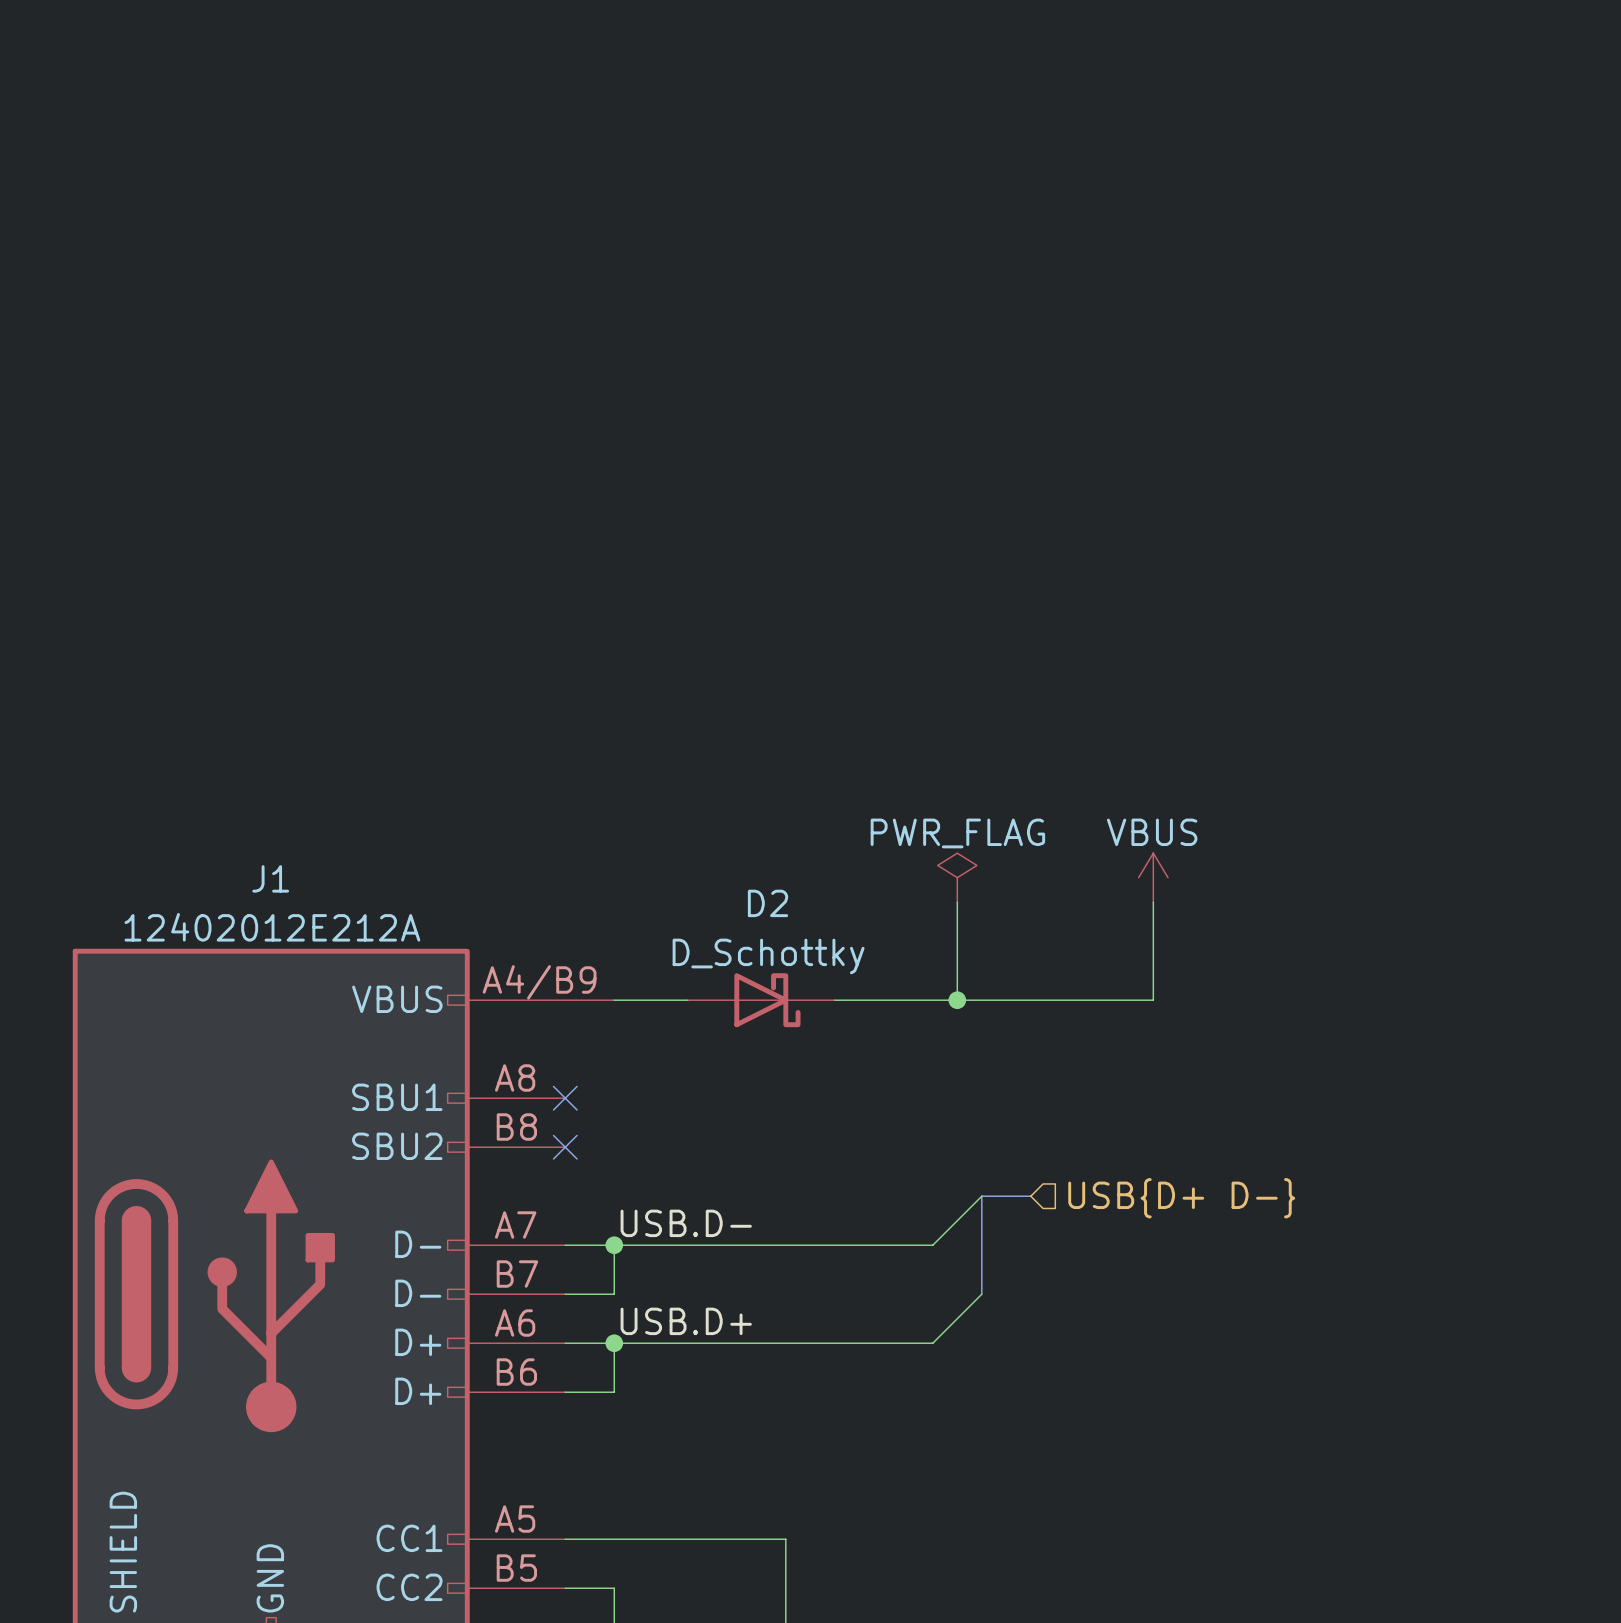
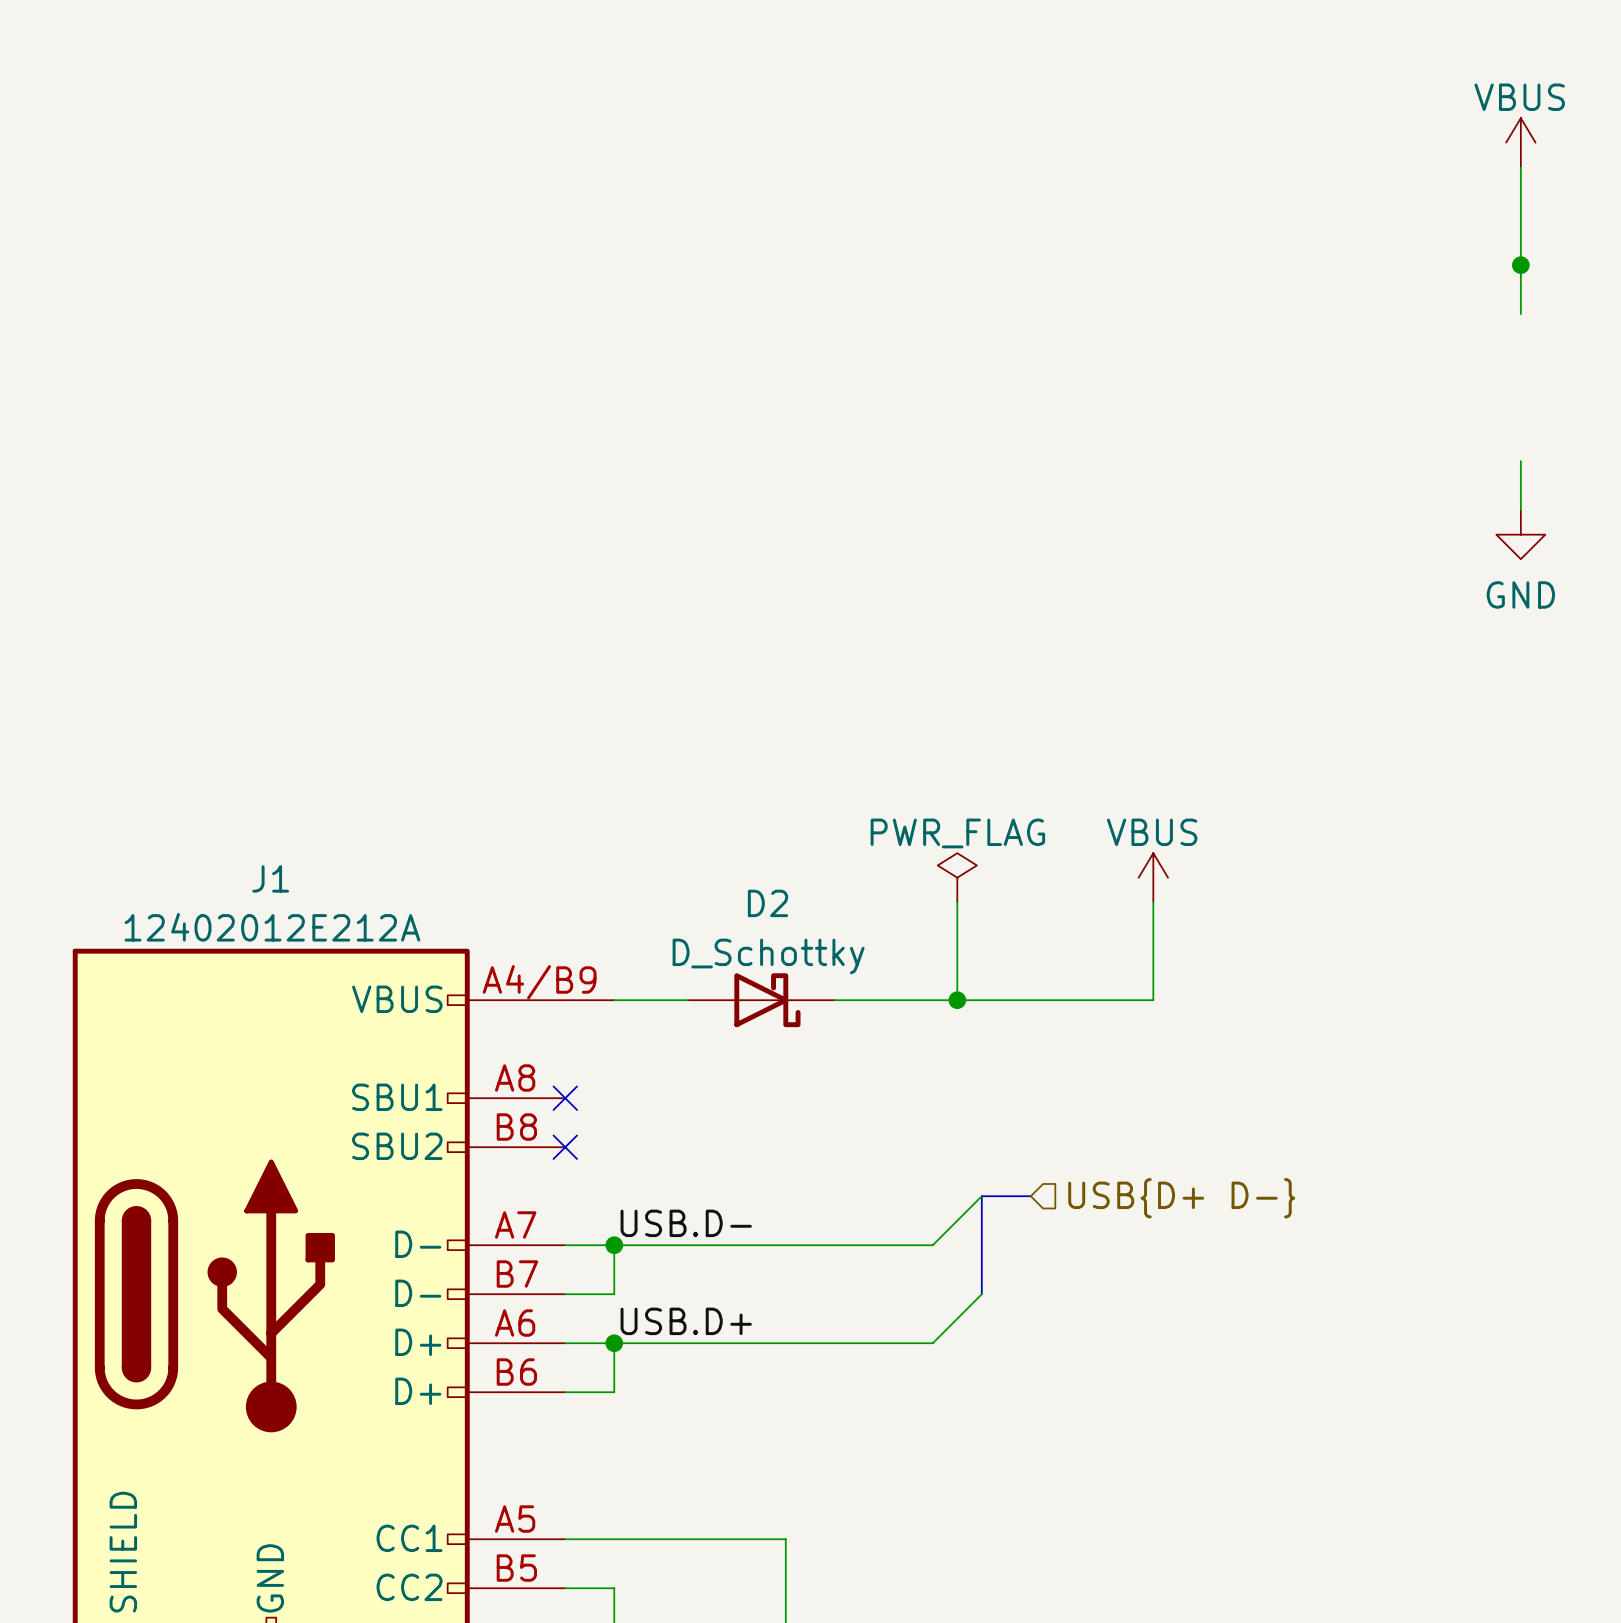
power symbol: none -> VBUS (1520, 142)
wire: none -> (1520, 167) (1520, 314)
junction: none -> (1520, 265)
wire: none -> (1520, 461) (1520, 510)
power symbol: none -> GND (1520, 534)

